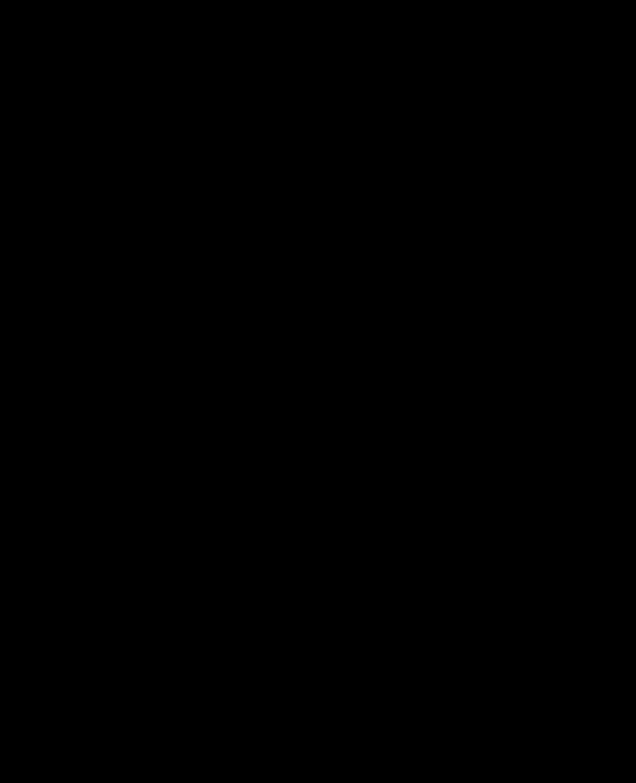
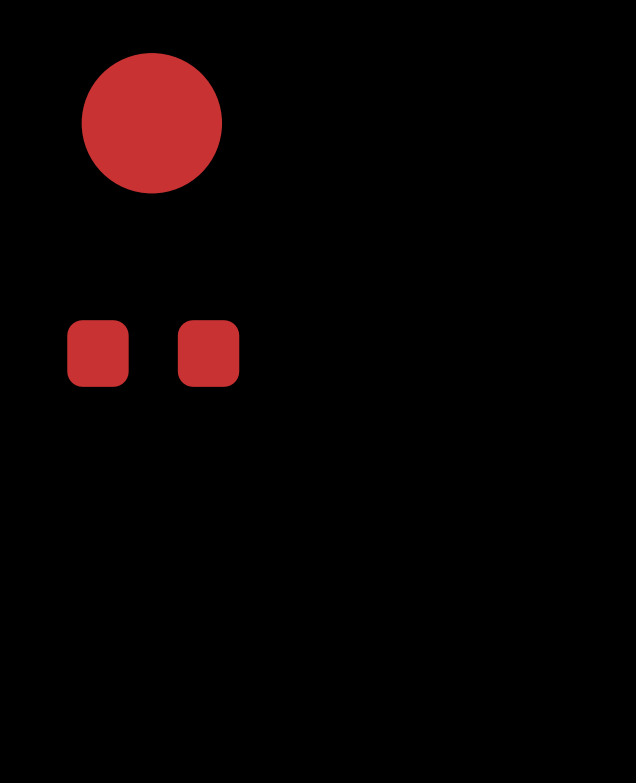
part: none -> (151, 123)
part: none -> (153, 353)

